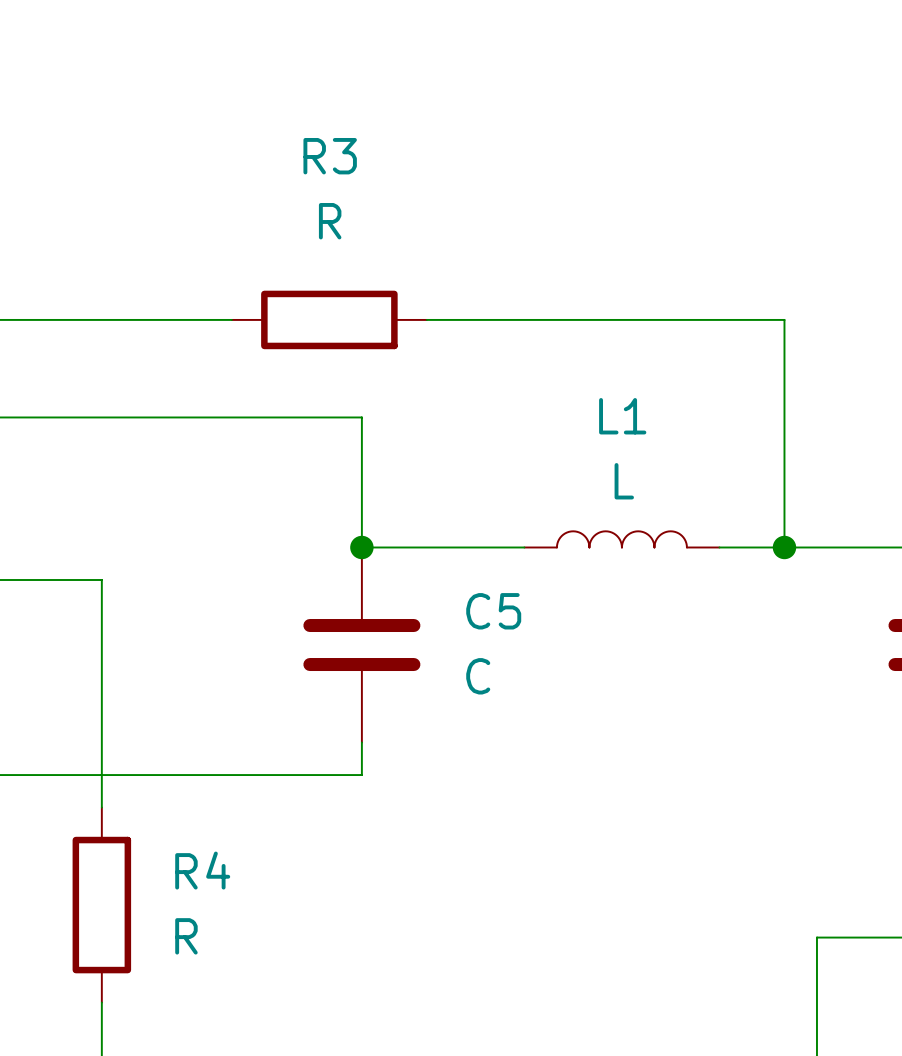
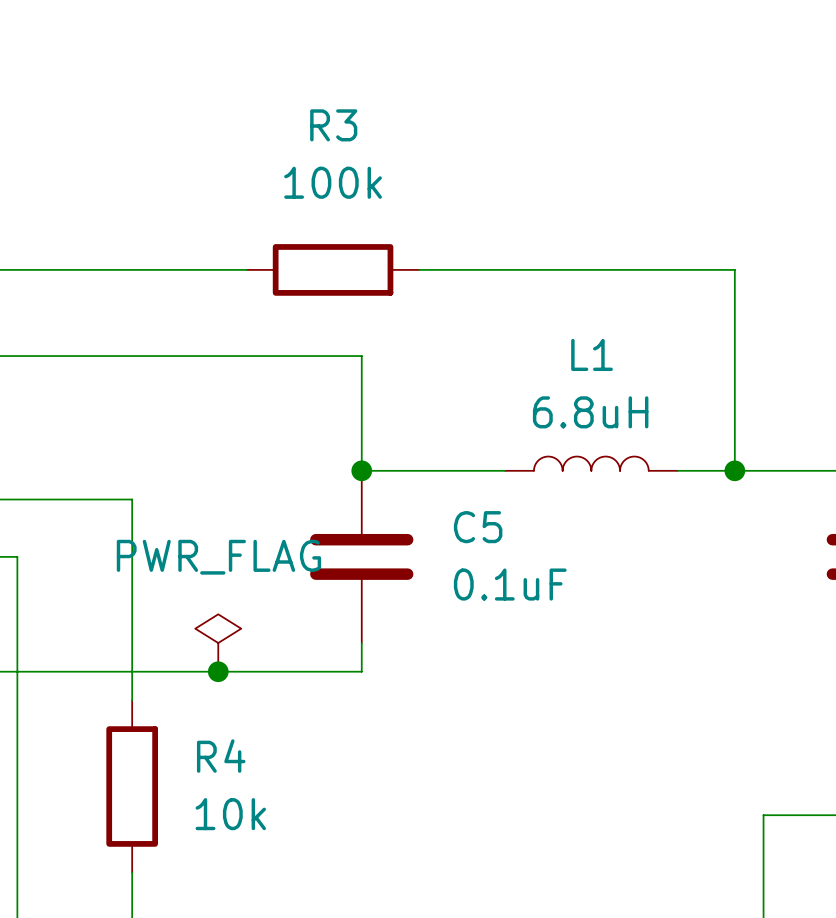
R3 value: R (330, 221) -> 100k (333, 182)
L1 value: L (624, 481) -> 6.8uH (590, 412)
C5 value: C (478, 676) -> 0.1uF (510, 584)
power symbol: none -> PWR_FLAG (218, 643)
junction: none -> (218, 671)
R4 value: R (186, 936) -> 10k (230, 814)

